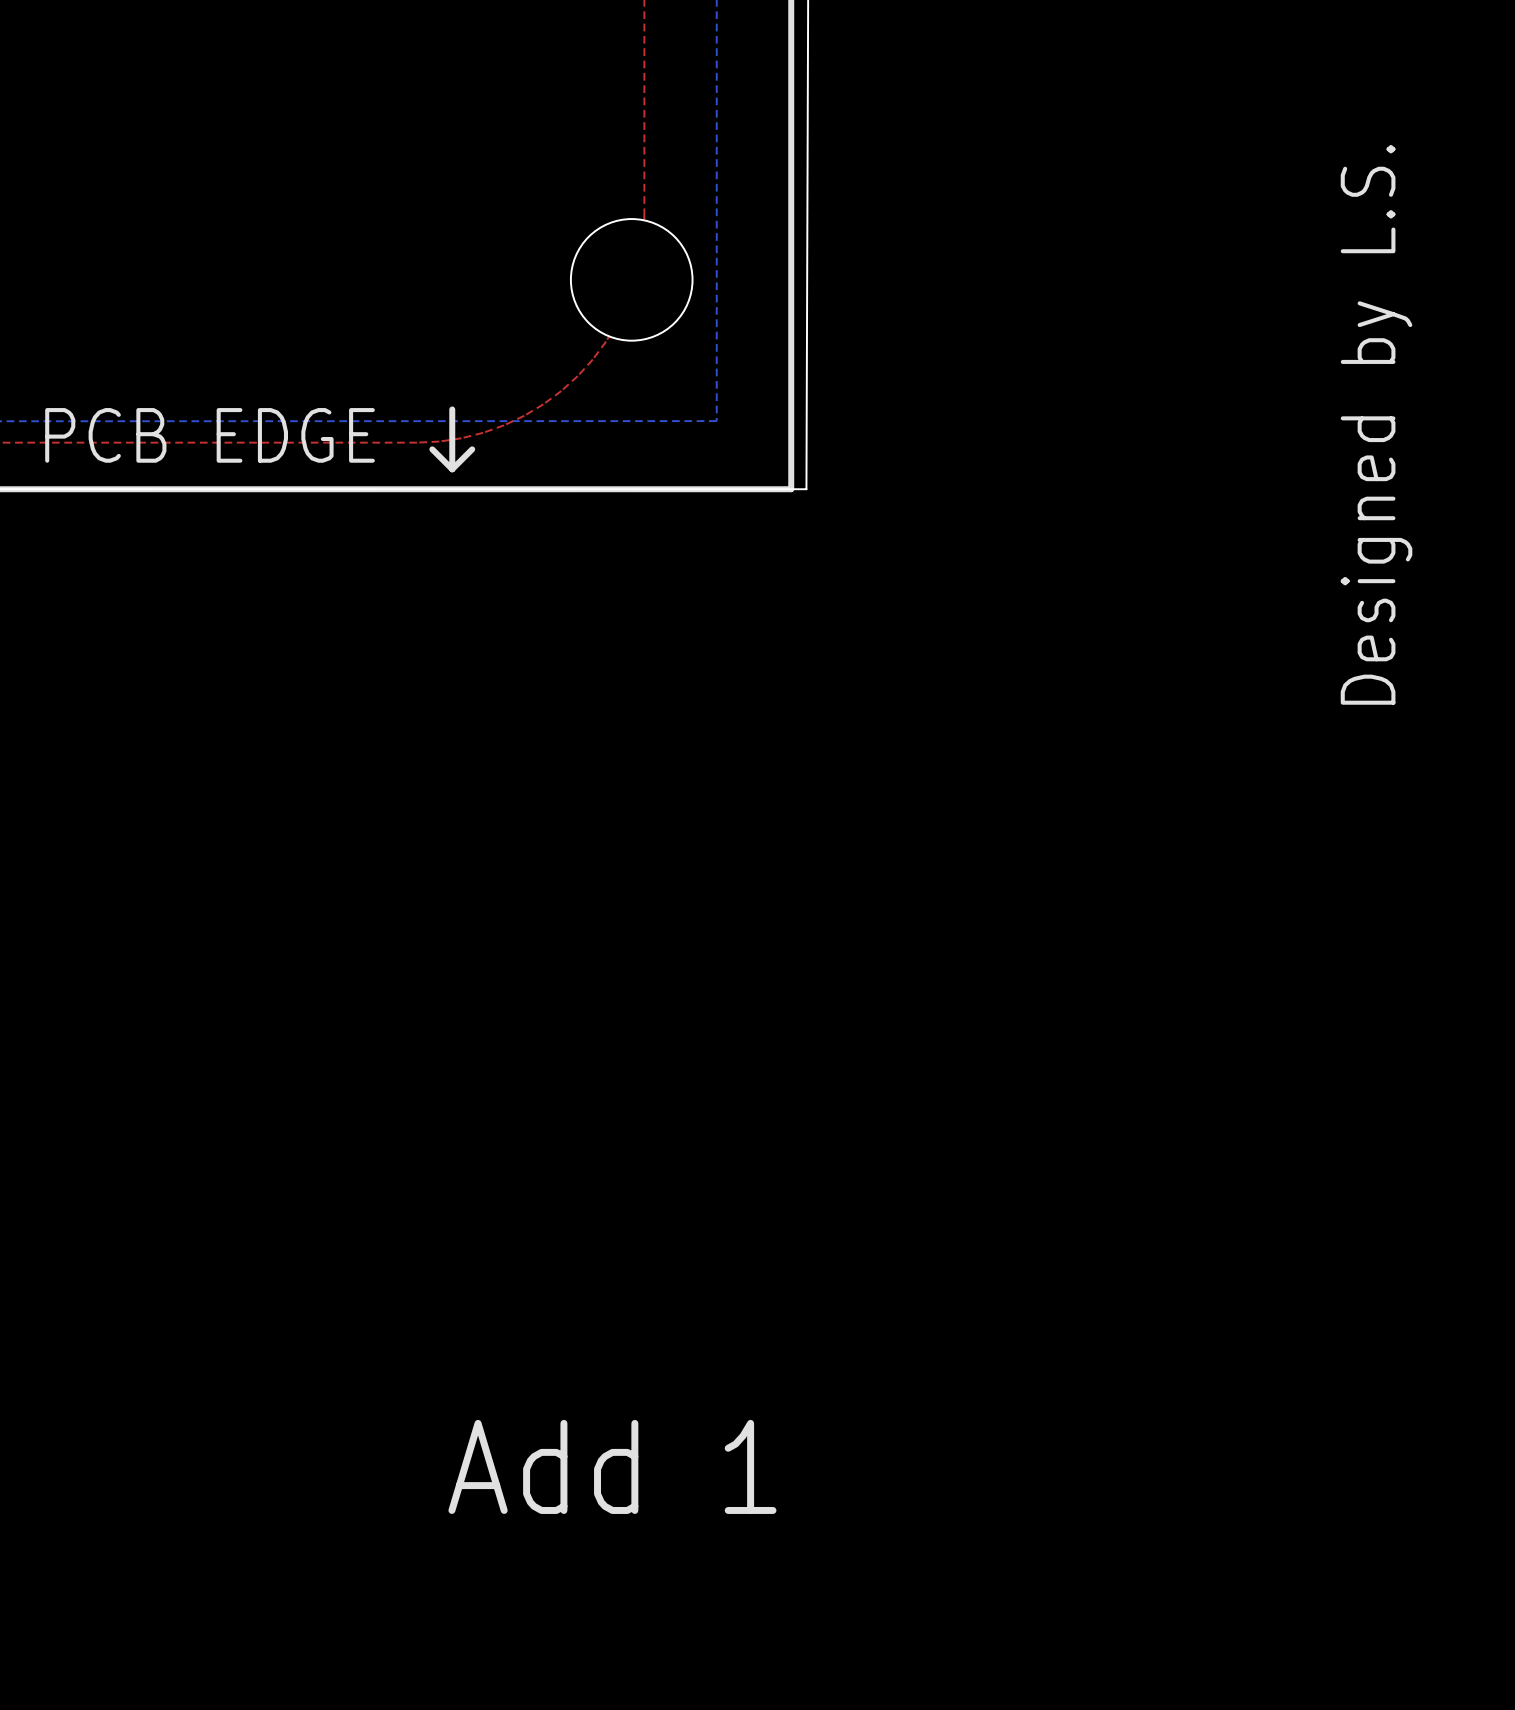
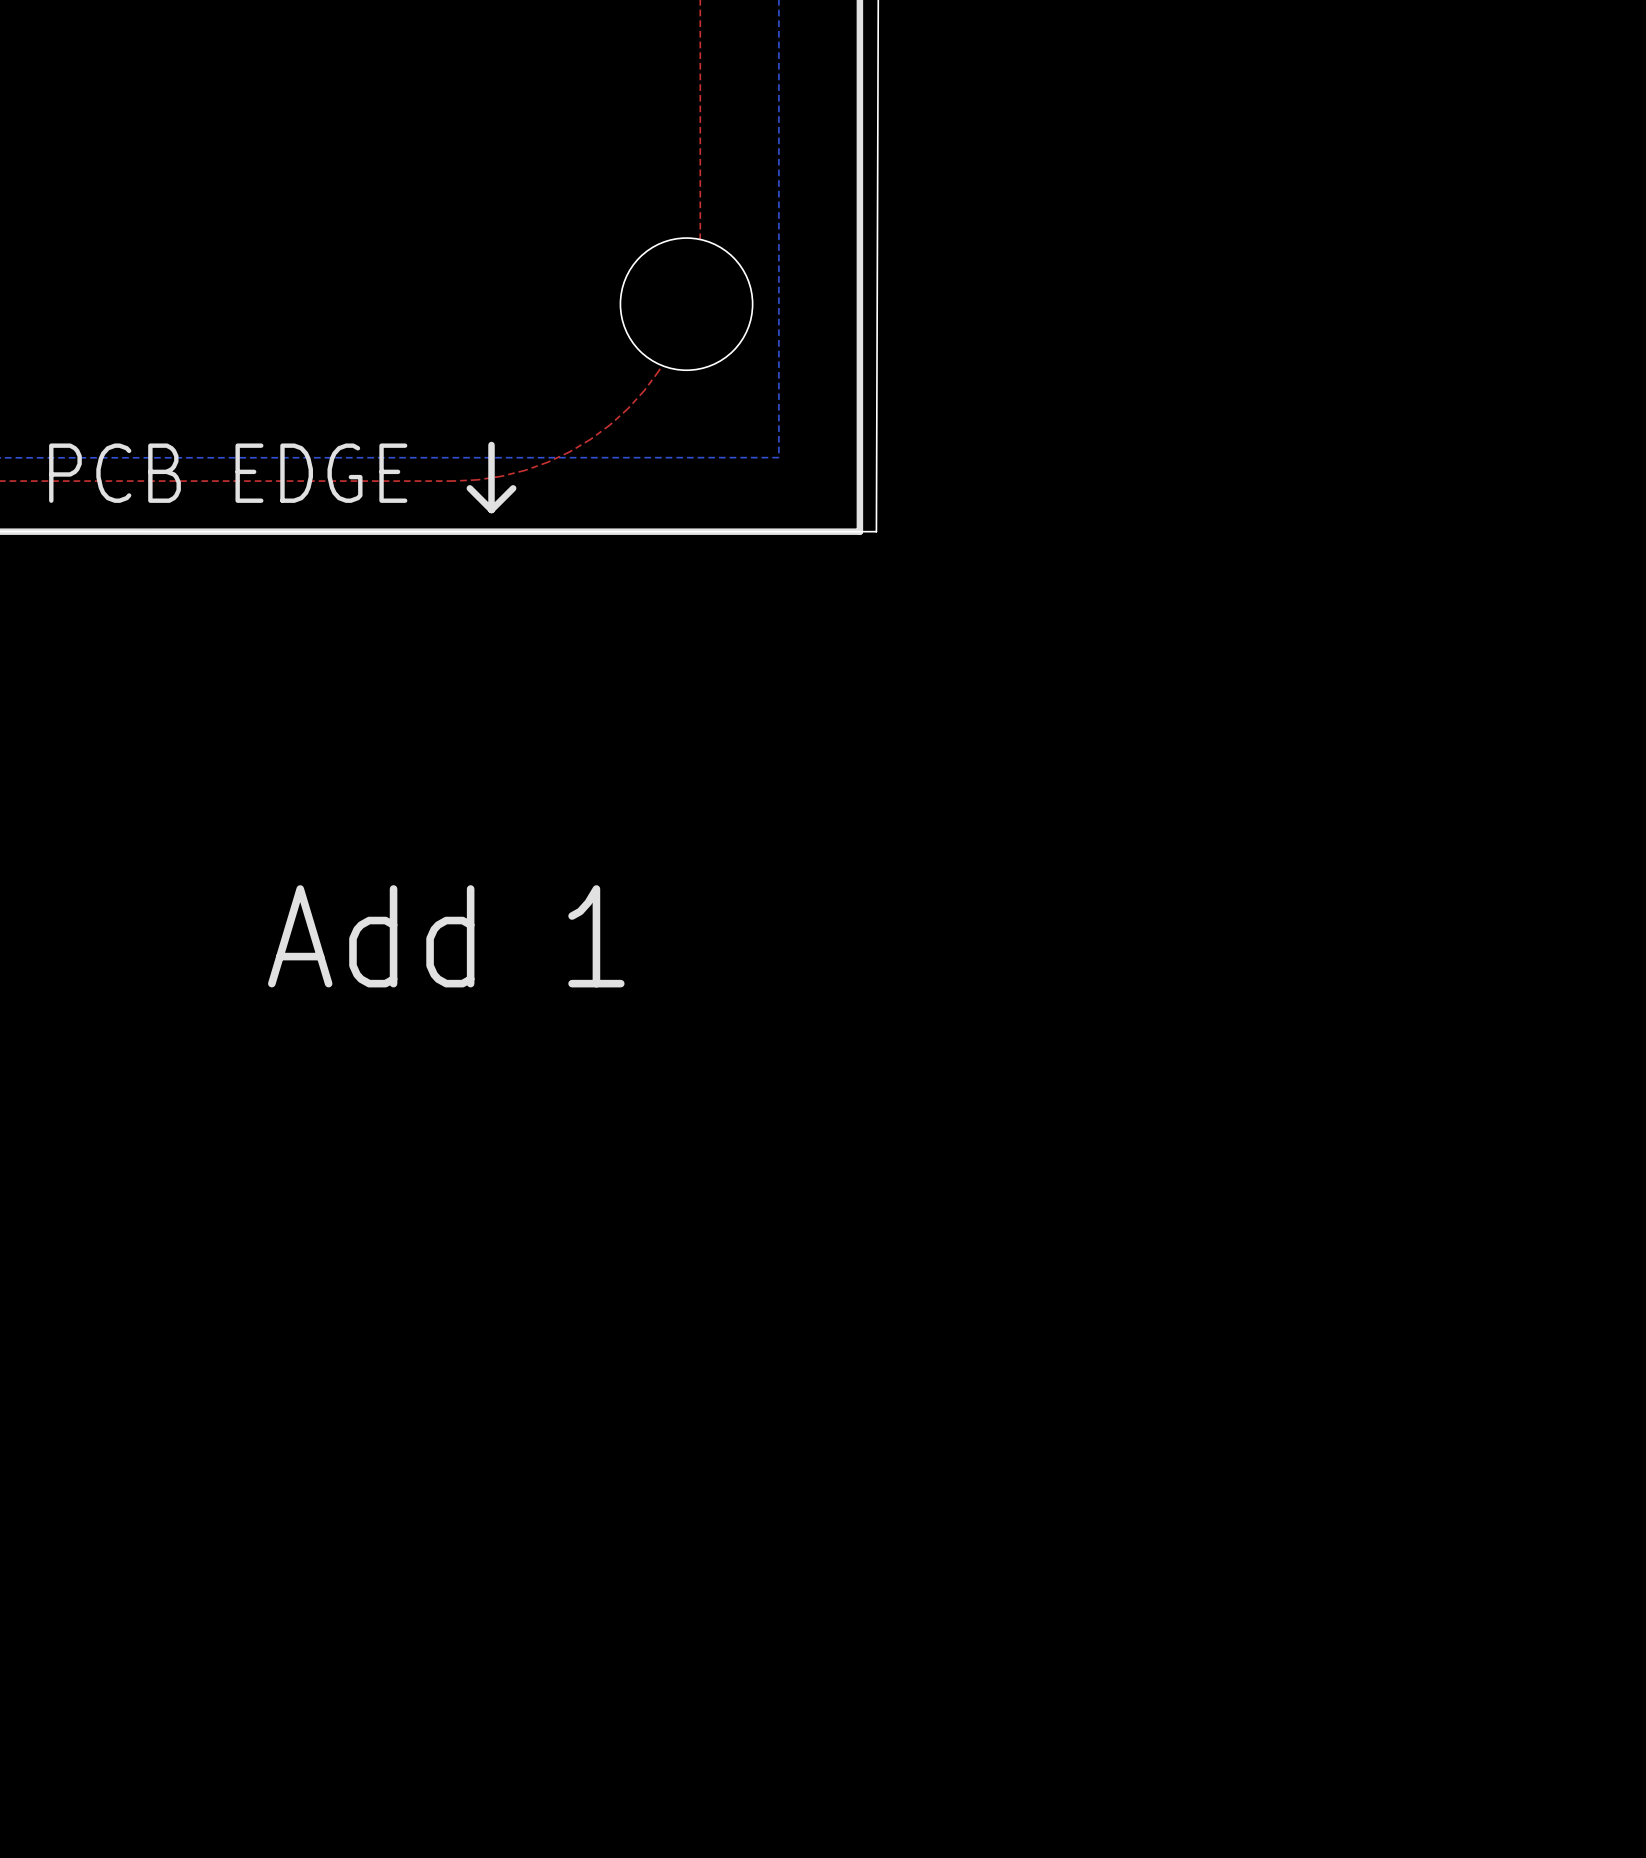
text: Designed by L.S. (1376, 424) -> none
text position: Add 1 (612, 1466) -> Add 1 (446, 936)

